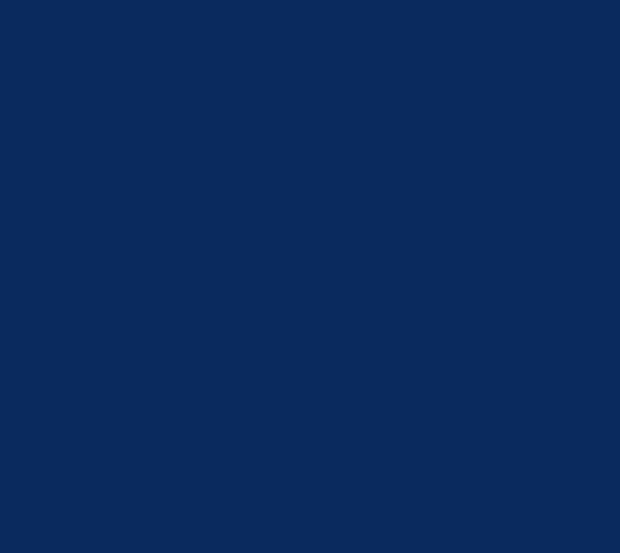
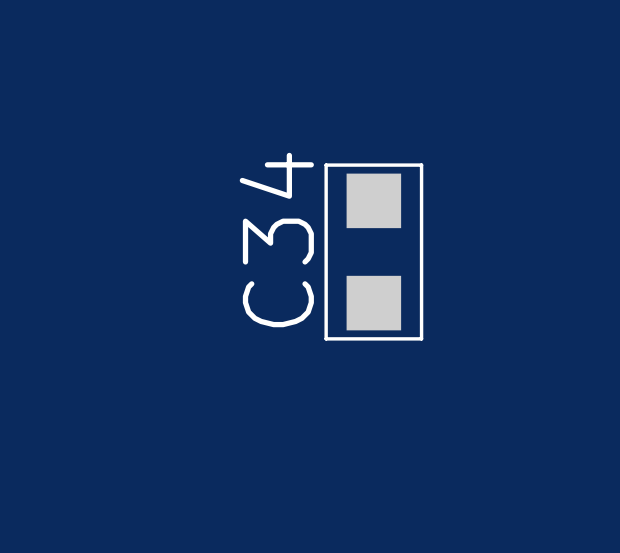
C34: none -> (373, 251)

